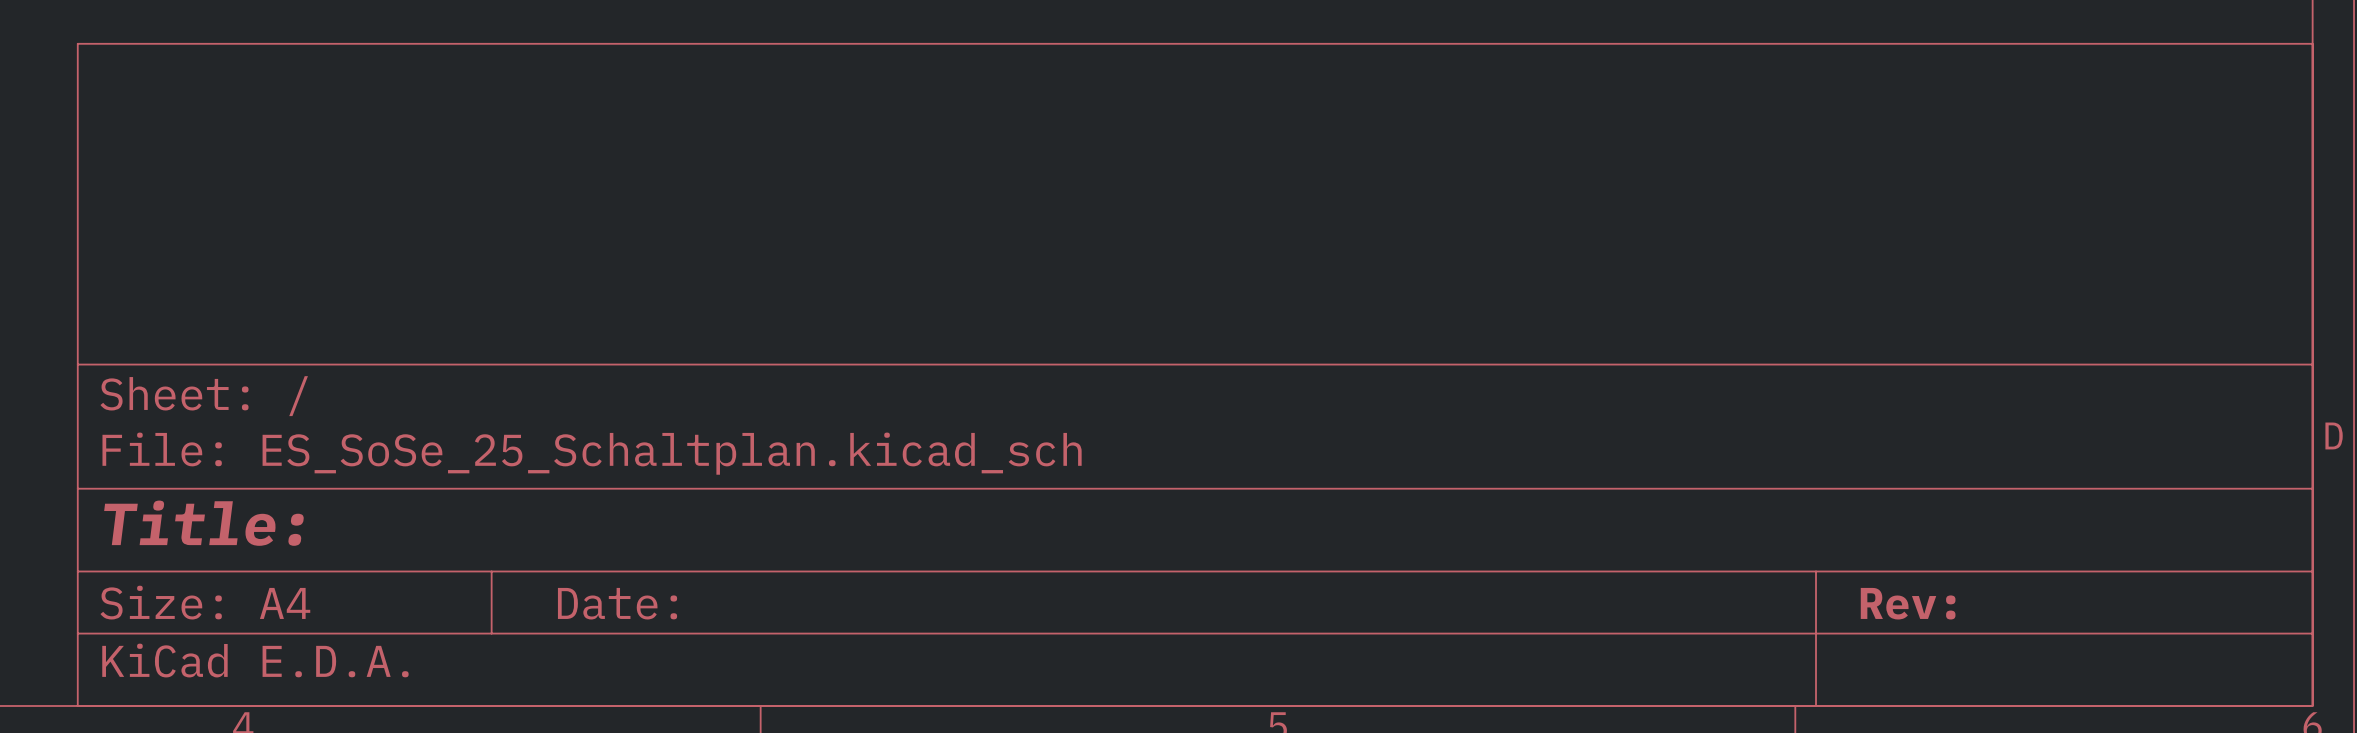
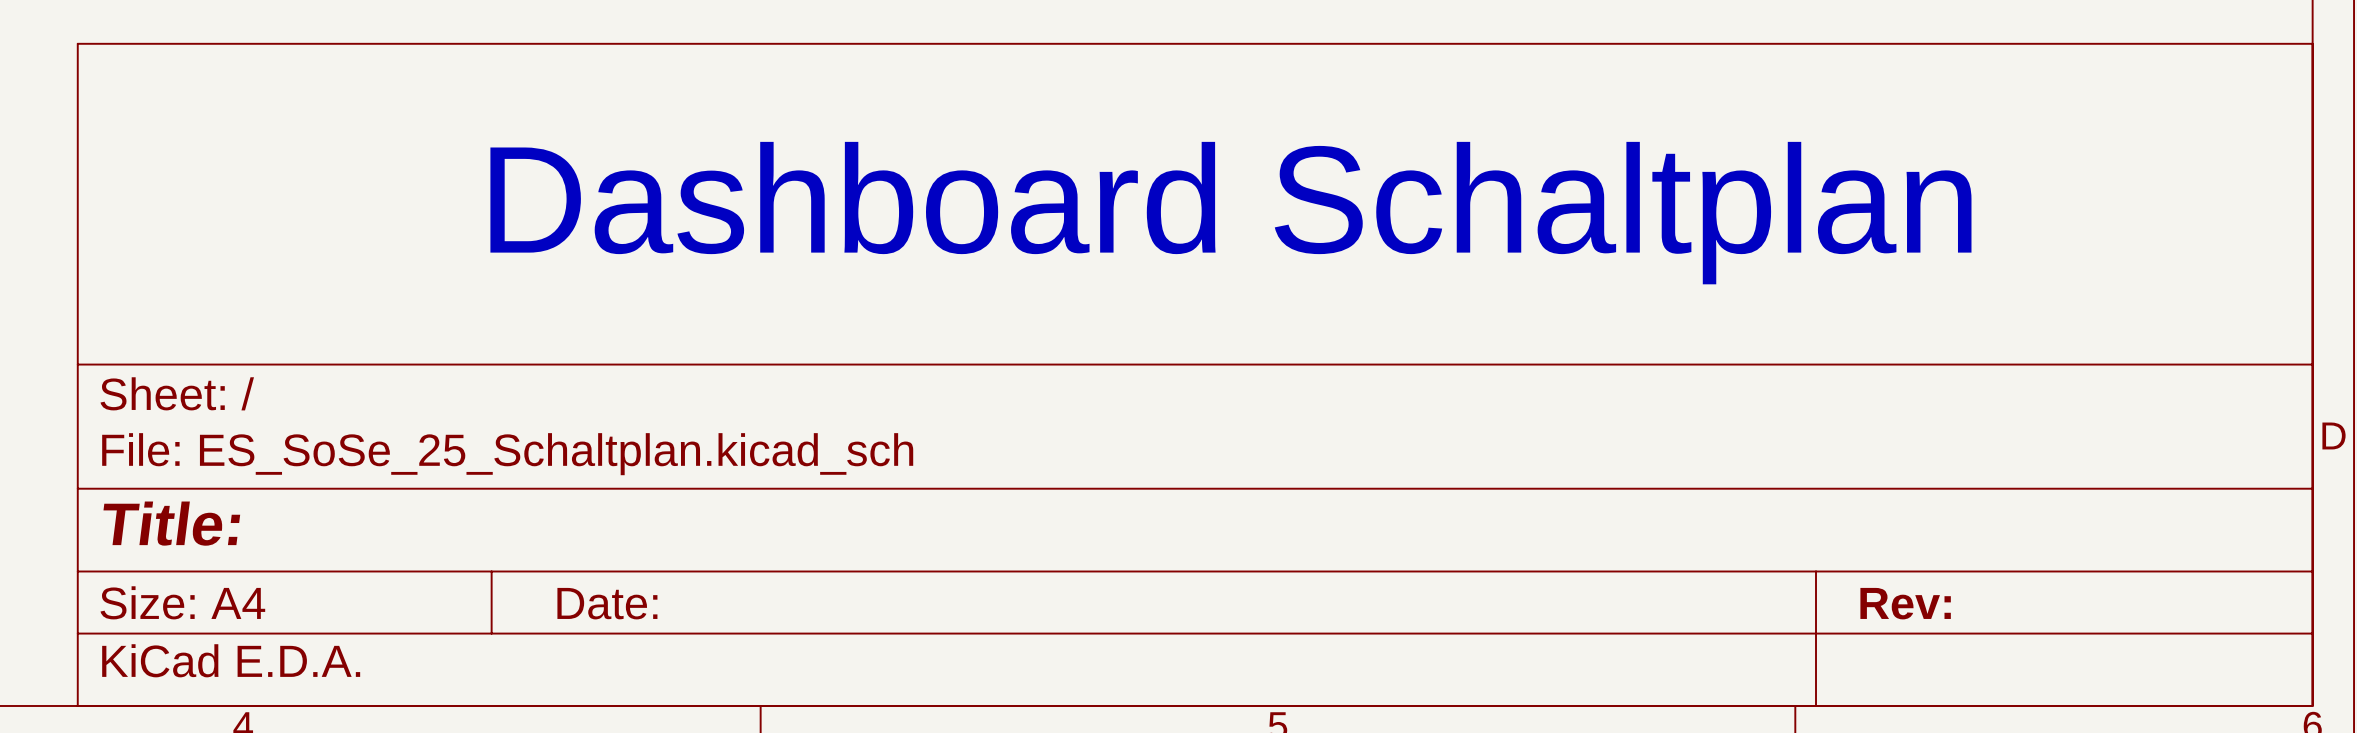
text: none -> Dashboard Schaltplan (1230, 213)

